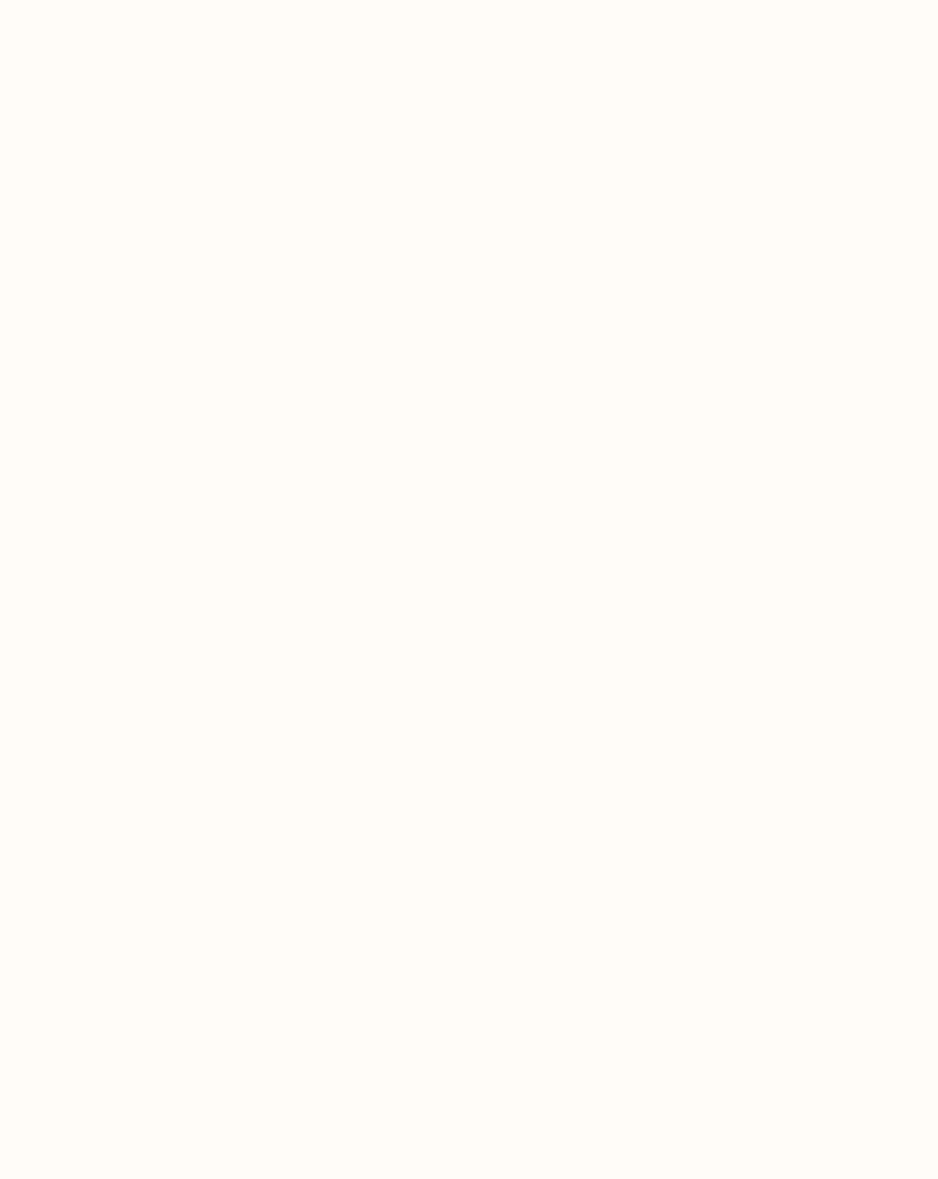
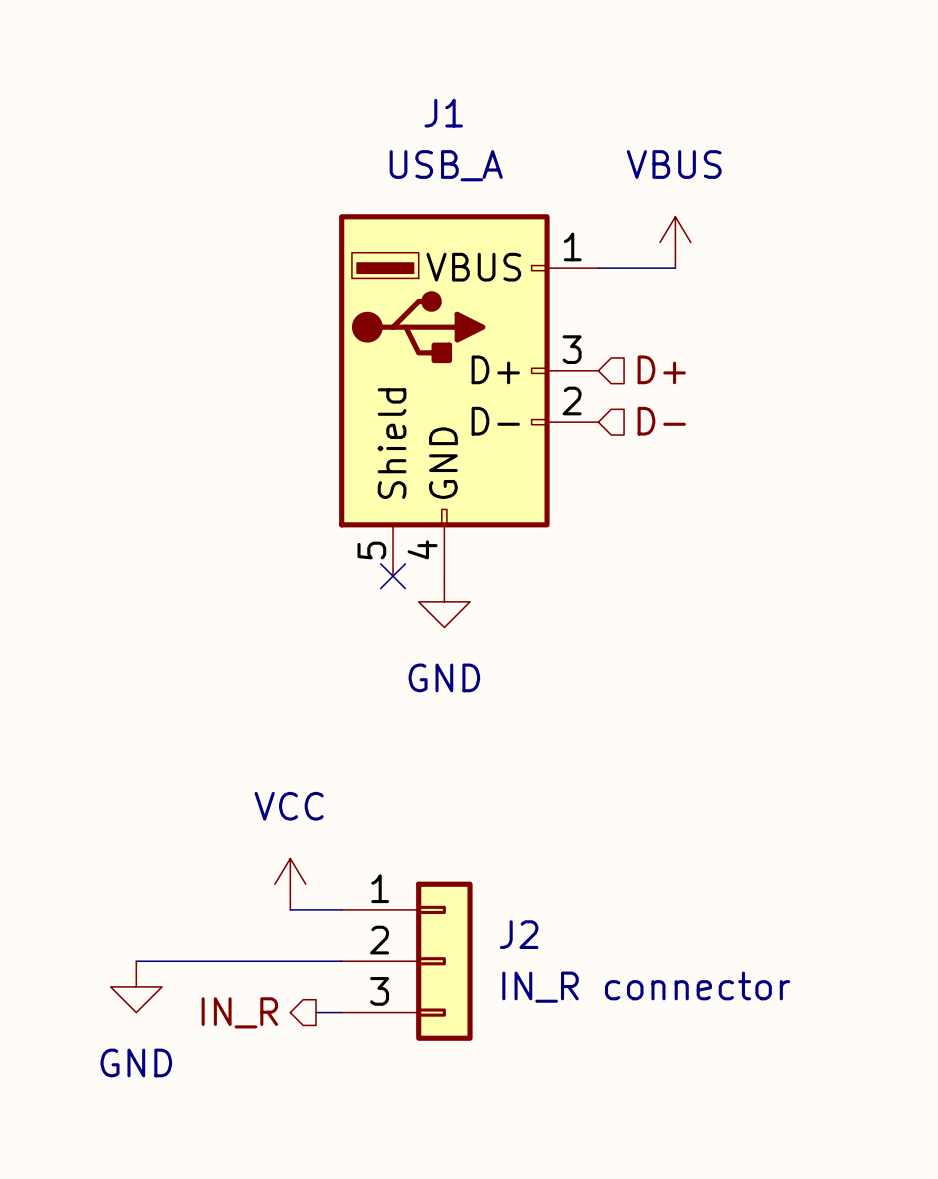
power symbol: none -> VBUS (675, 242)
wire: none -> (598, 268) (675, 268)
hierarchical label: none -> D+ (661, 369)
J1: none -> USB_A (468, 395)
hierarchical label: none -> D- (661, 421)
no-connect mark: none -> (393, 576)
power symbol: none -> GND (444, 601)
power symbol: none -> VCC (290, 884)
wire: none -> (290, 909) (341, 909)
wire: none -> (136, 961) (341, 961)
J2: none -> IN_R connector (407, 961)
power symbol: none -> GND (136, 986)
hierarchical label: none -> IN_R (239, 1012)
wire: none -> (316, 1012) (341, 1012)

